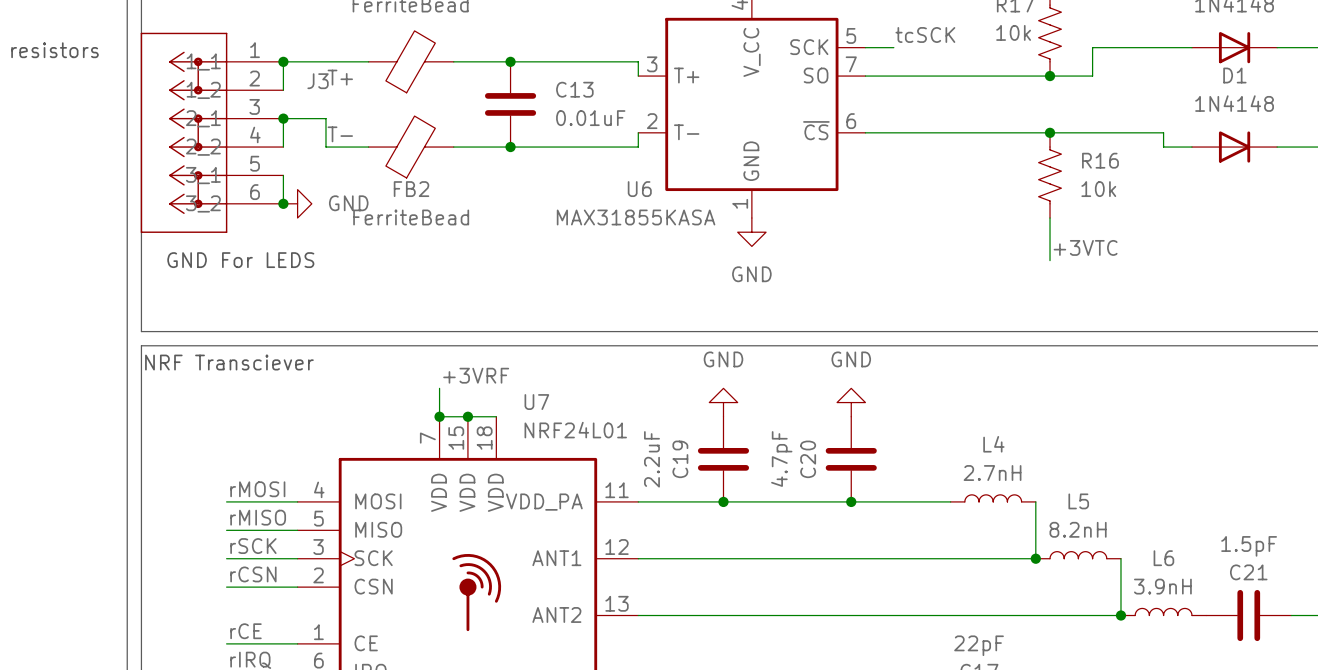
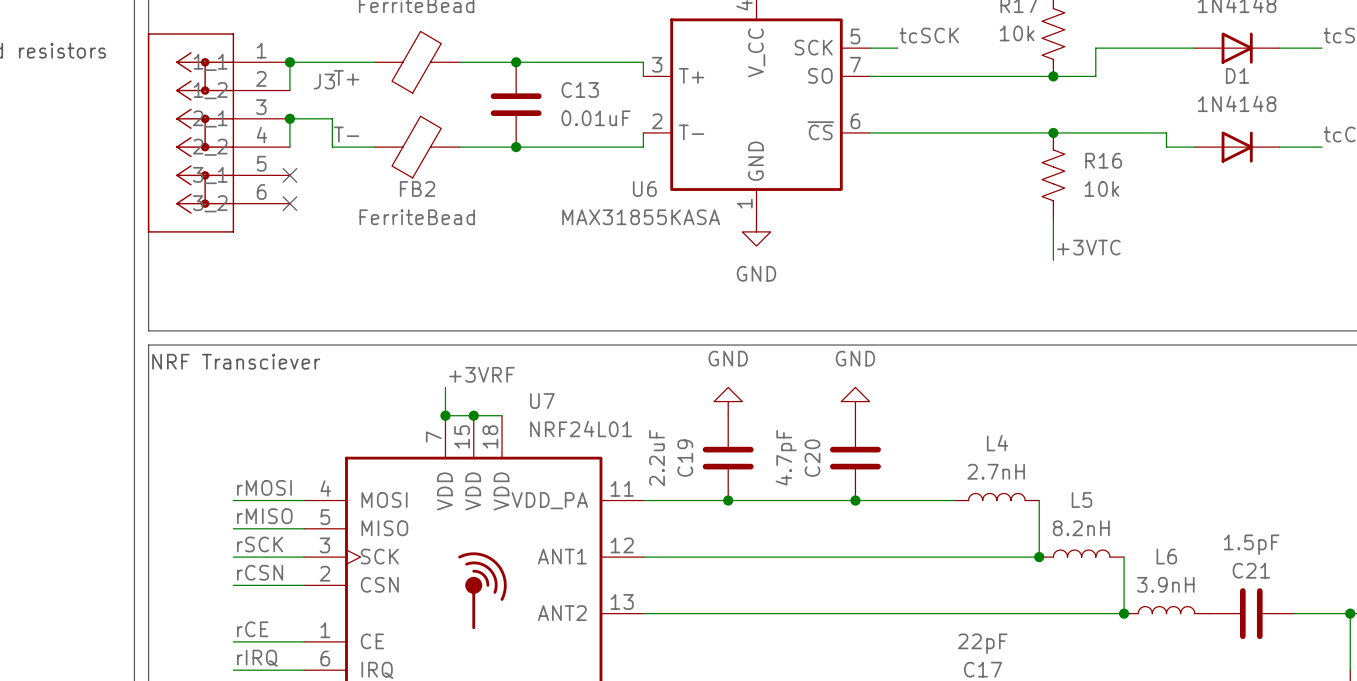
wire: (283, 175) (283, 203) -> none
no-connect mark: none -> (289, 175)
junction: (283, 203) -> none
no-connect mark: none -> (289, 203)
power symbol: GND (297, 203) -> none
text: GND For LEDS (240, 260) -> none

